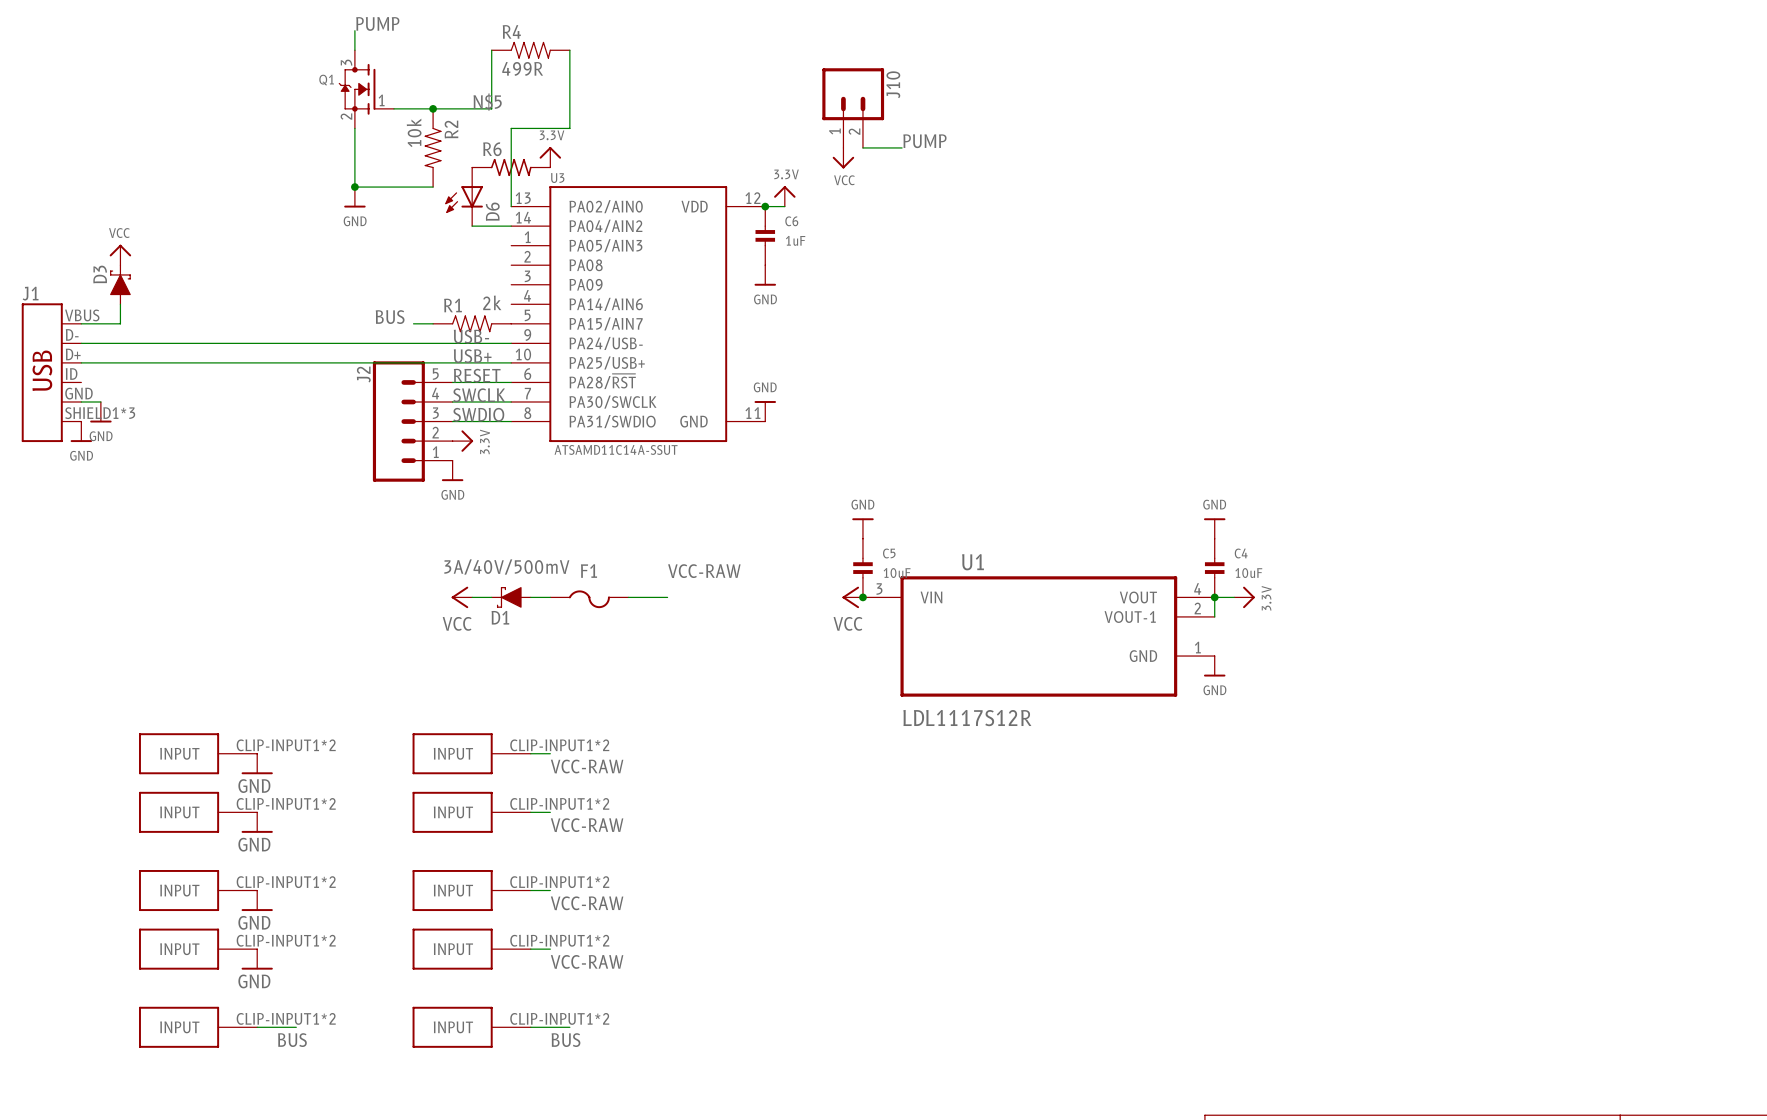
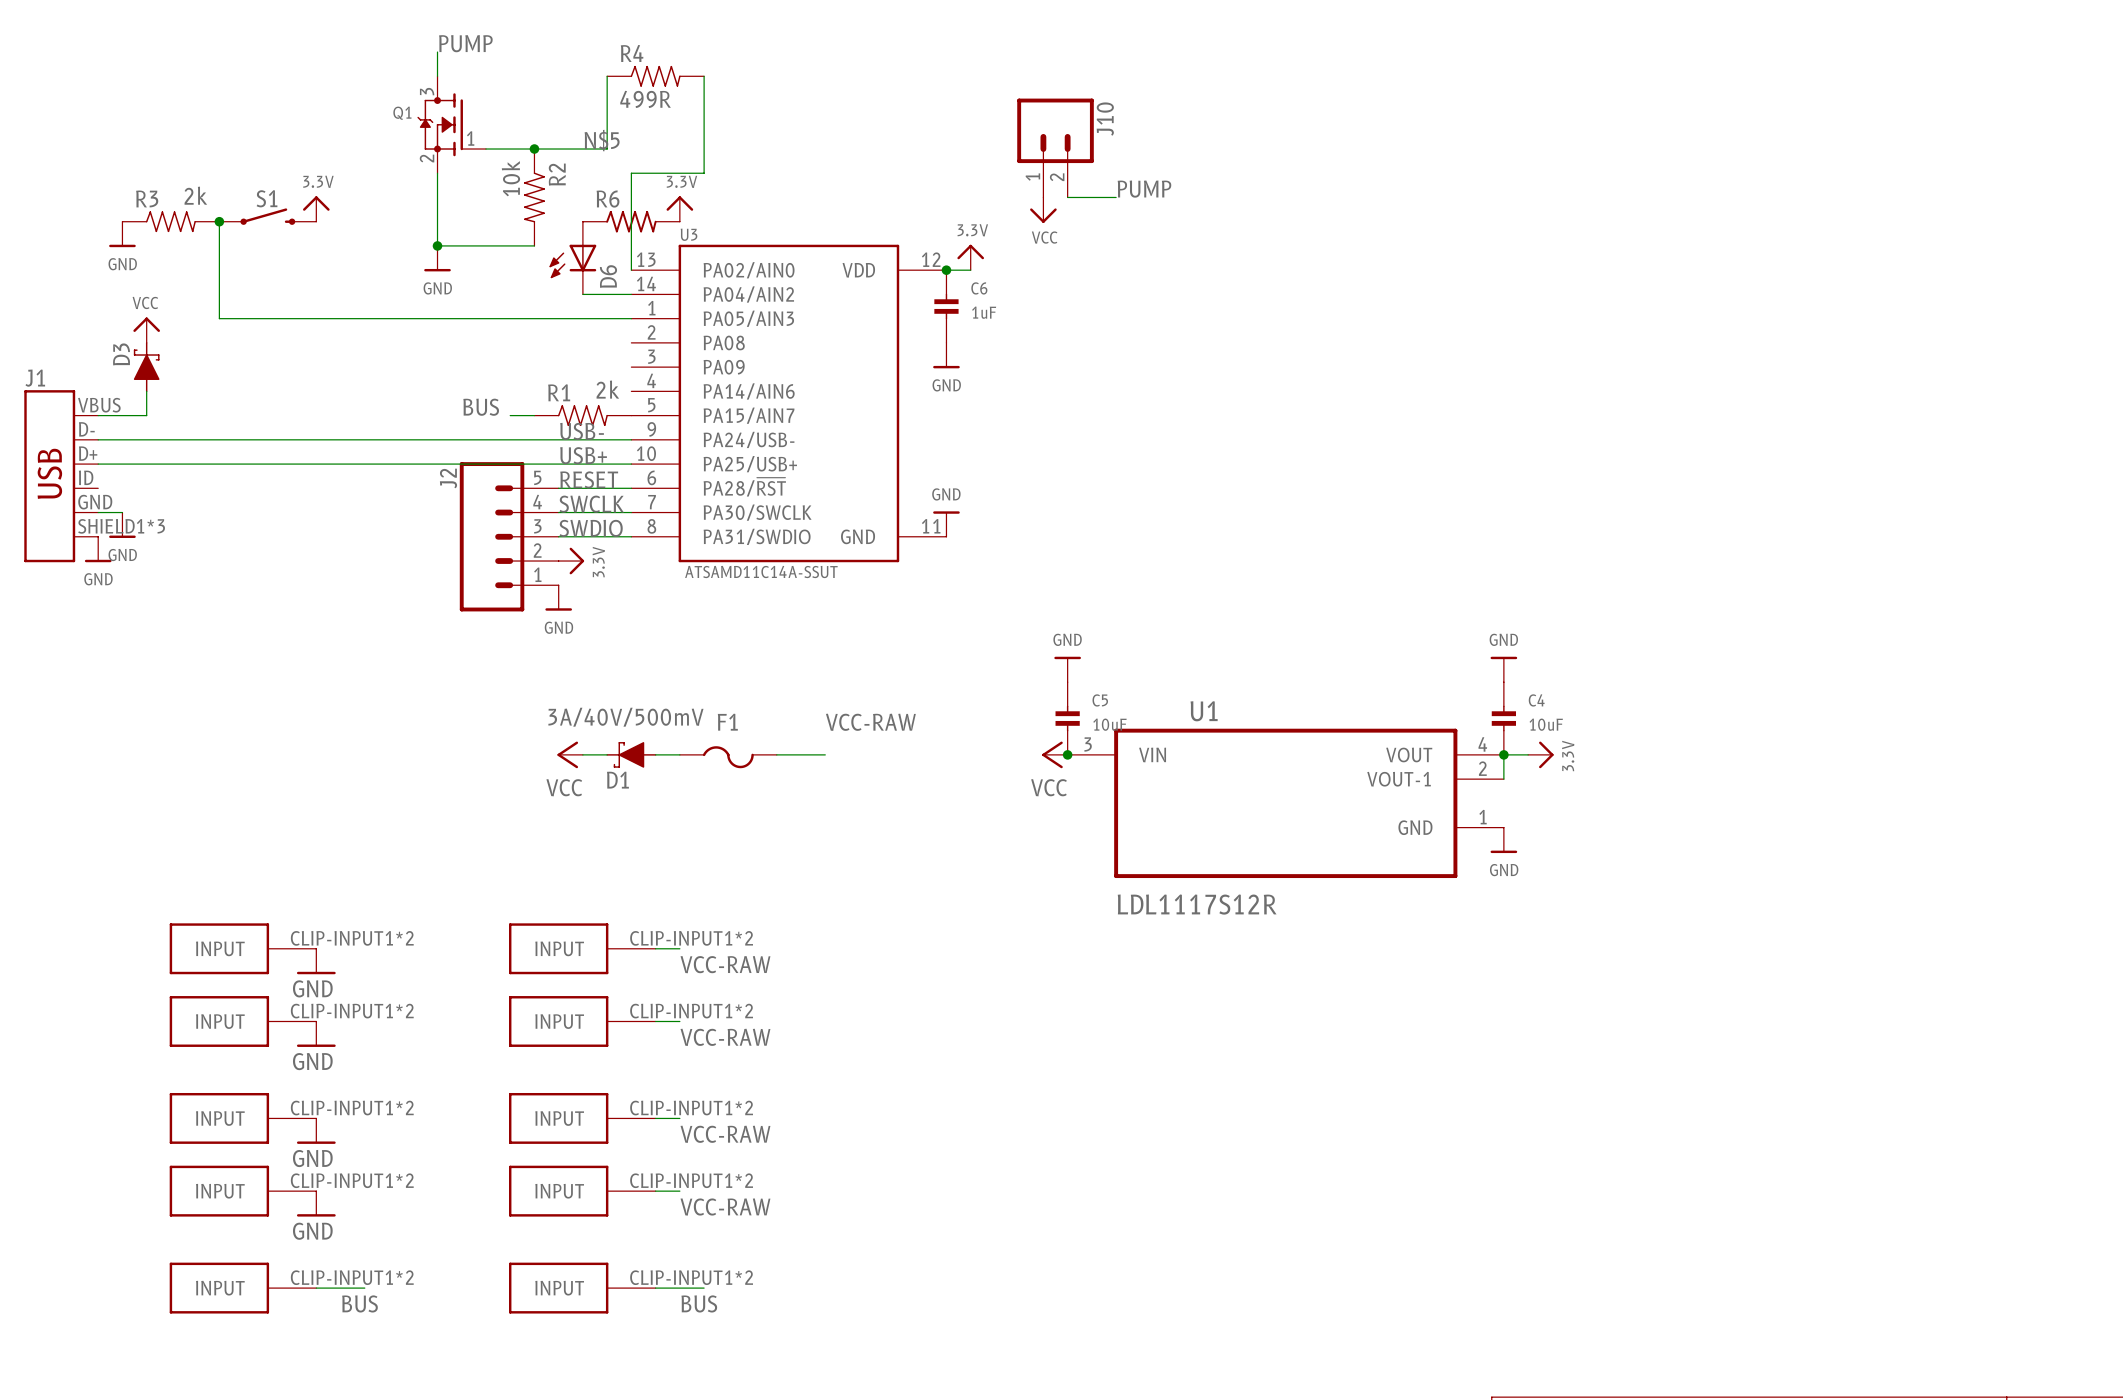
power symbol: none -> 3.3V (316, 208)
S1: none -> (267, 216)
R3: none -> 2k (170, 221)
wire: none -> (219, 221) (219, 318) (631, 318)
junction: none -> (219, 221)
power symbol: none -> GND (122, 234)

